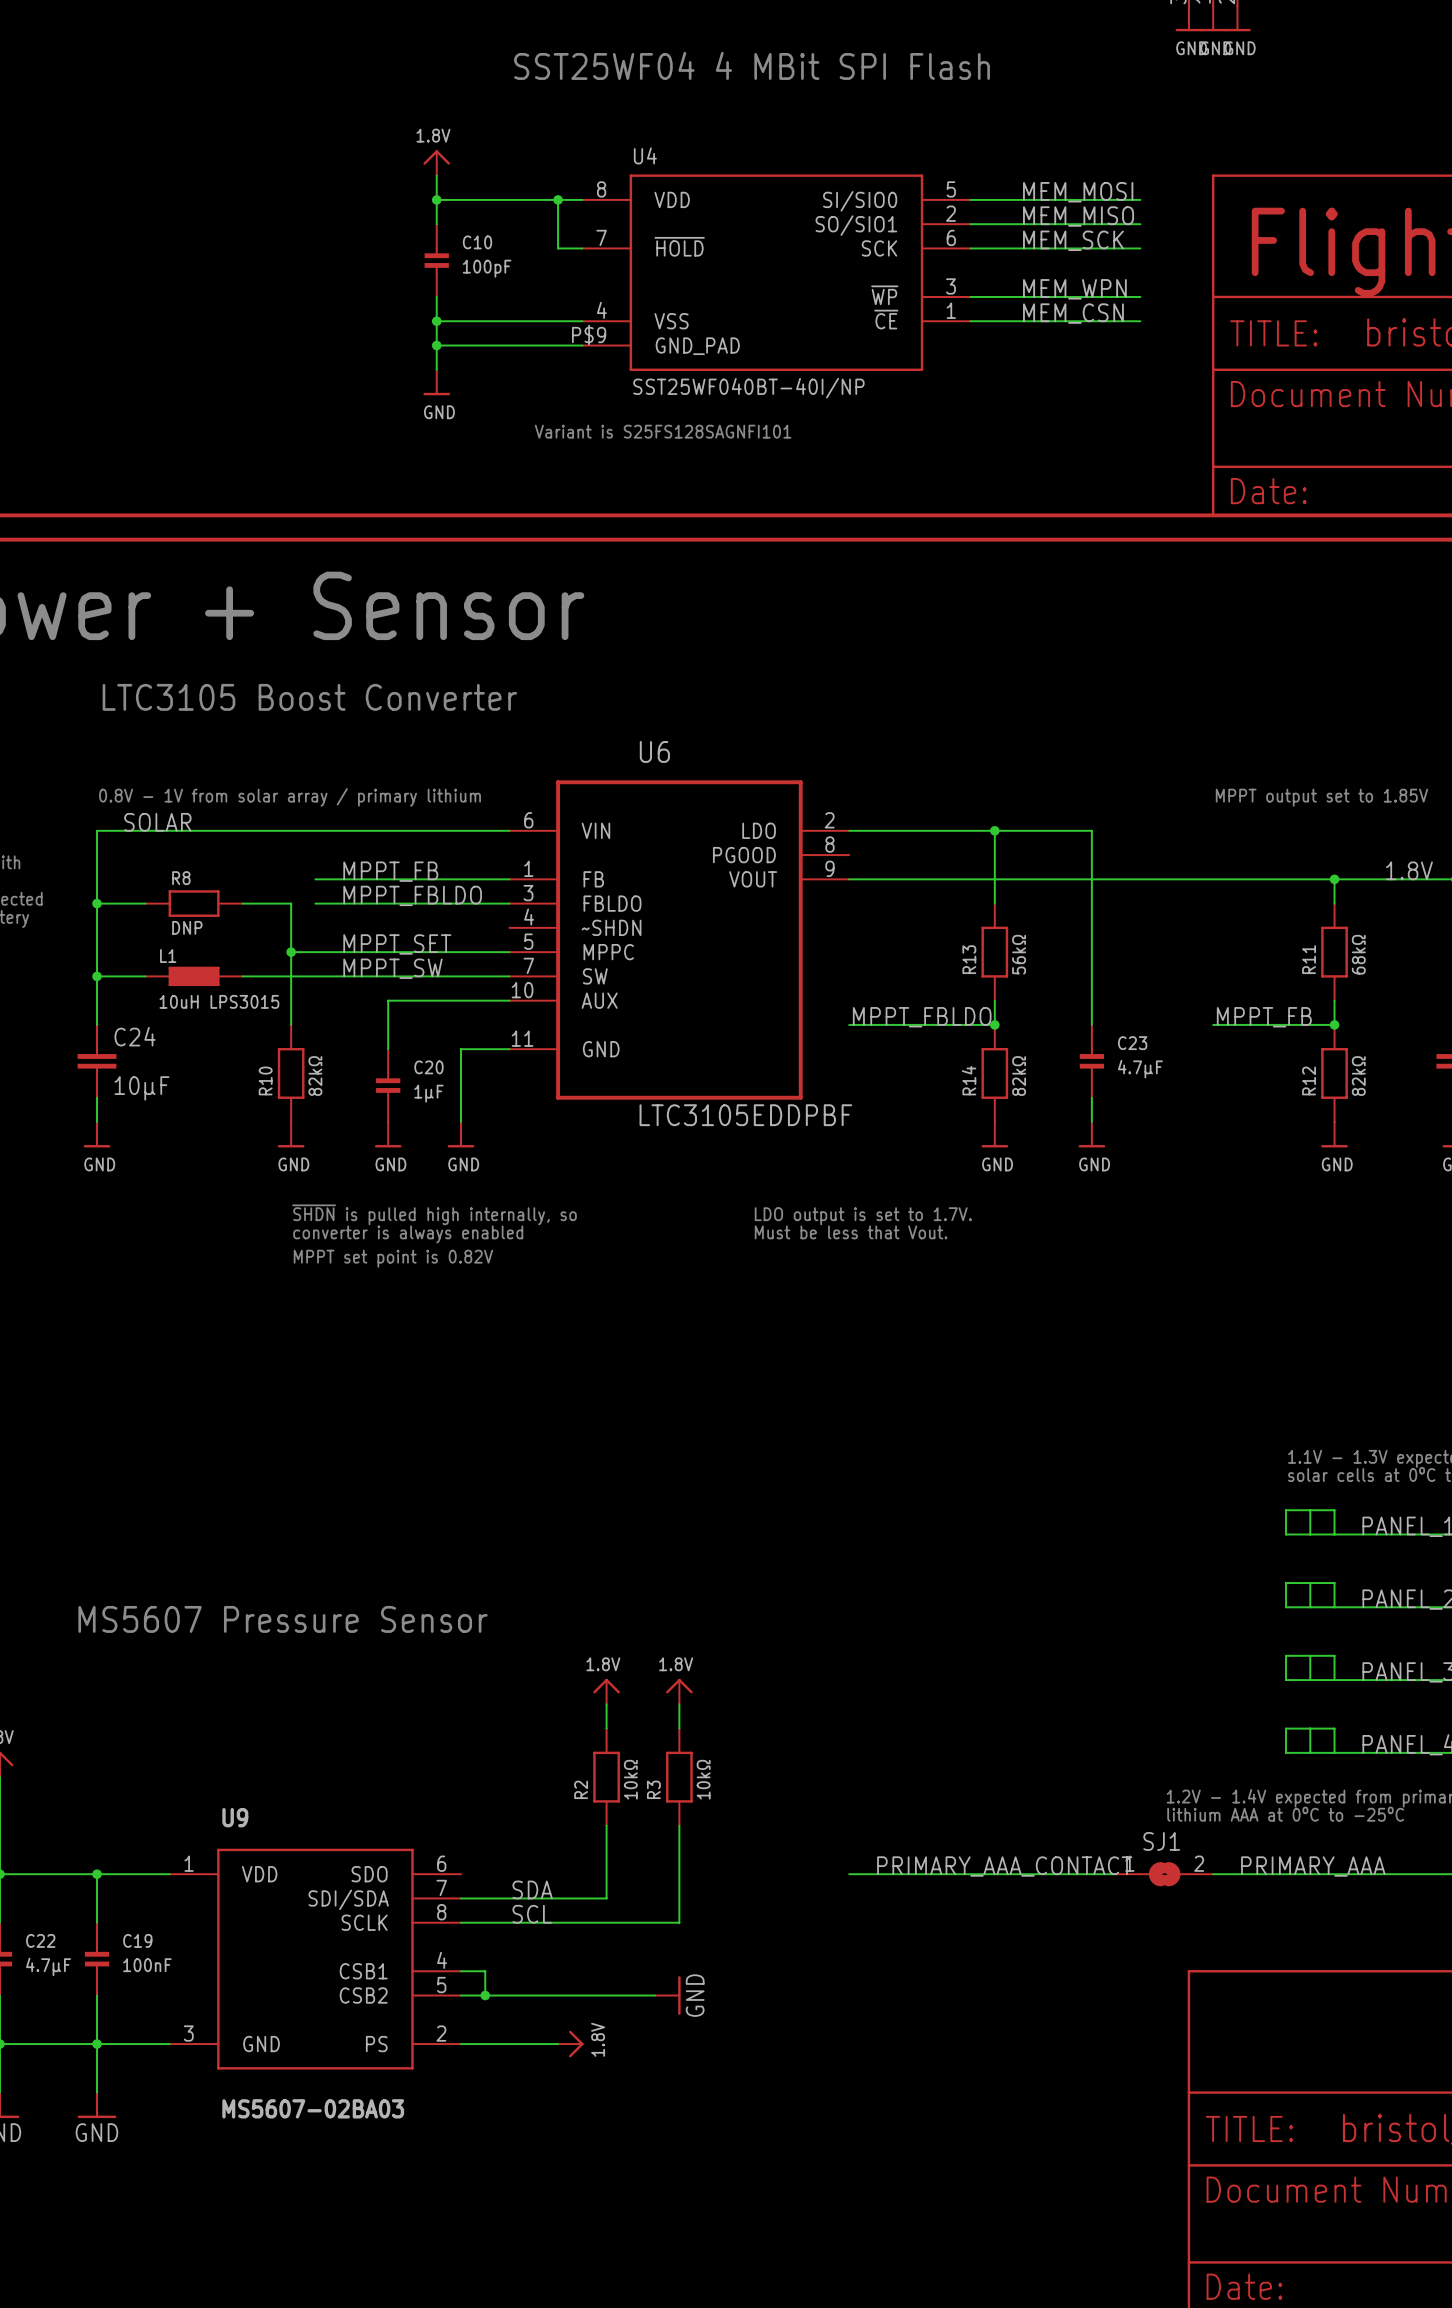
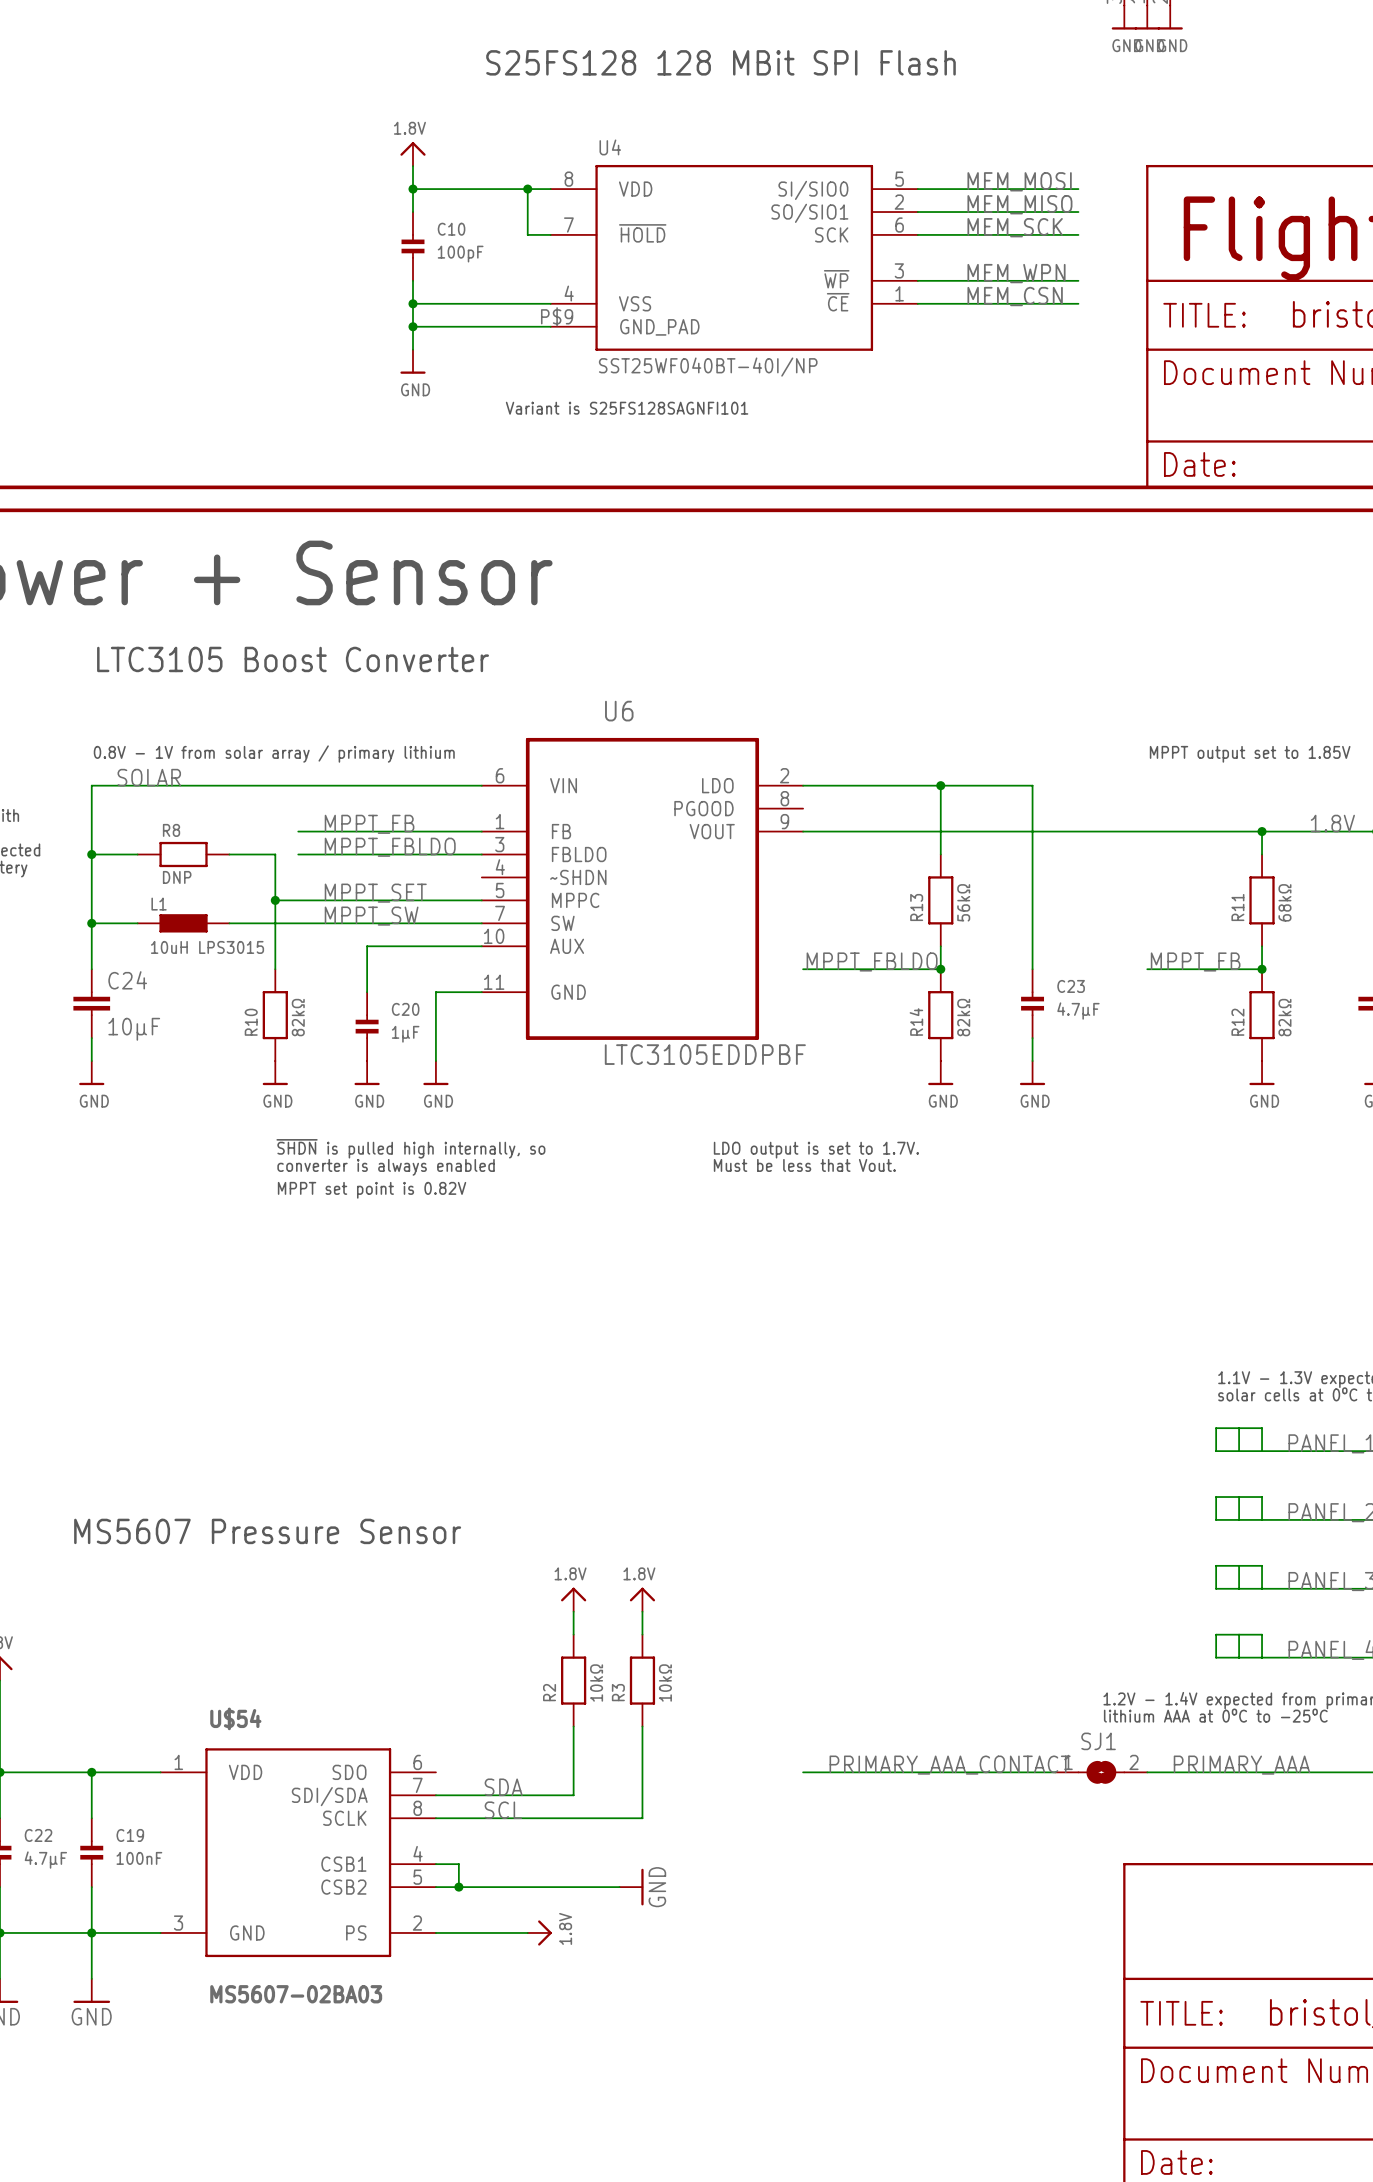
text: SST25WF04 4 MBit SPI Flash (752, 65) -> S25FS128 128 MBit SPI Flash (720, 62)
U9 name: U9 (235, 1817) -> U$54 (235, 1718)

